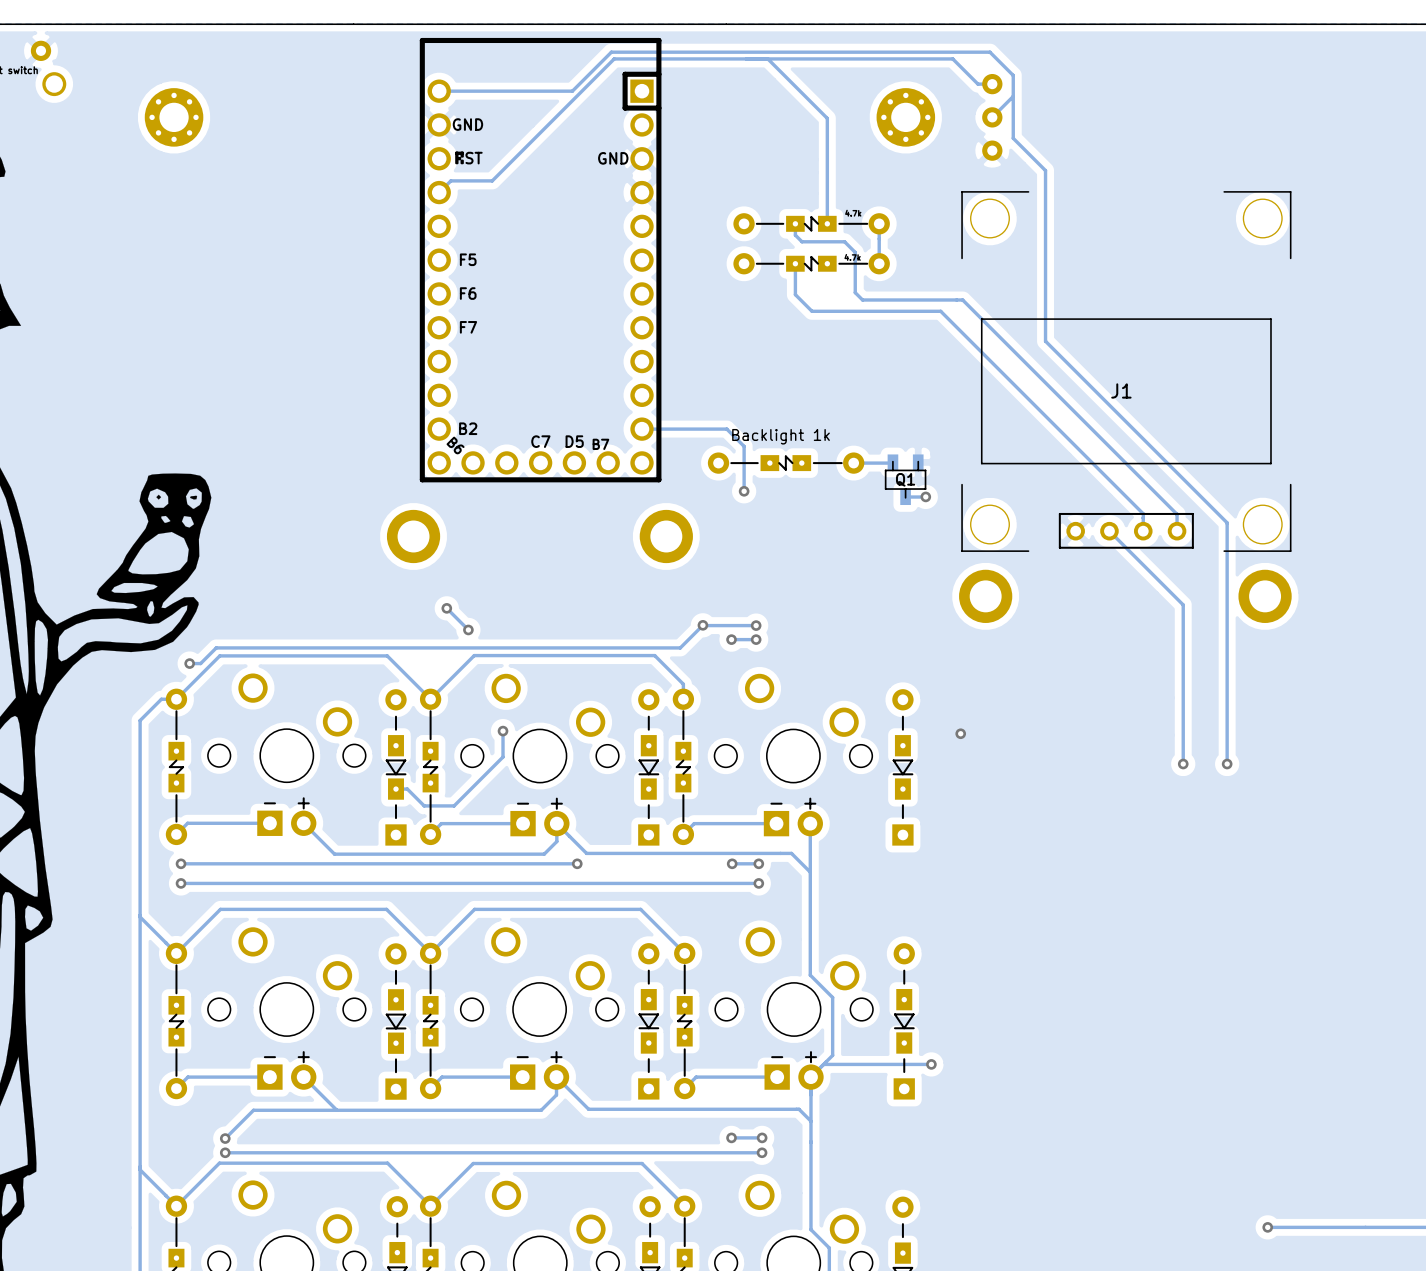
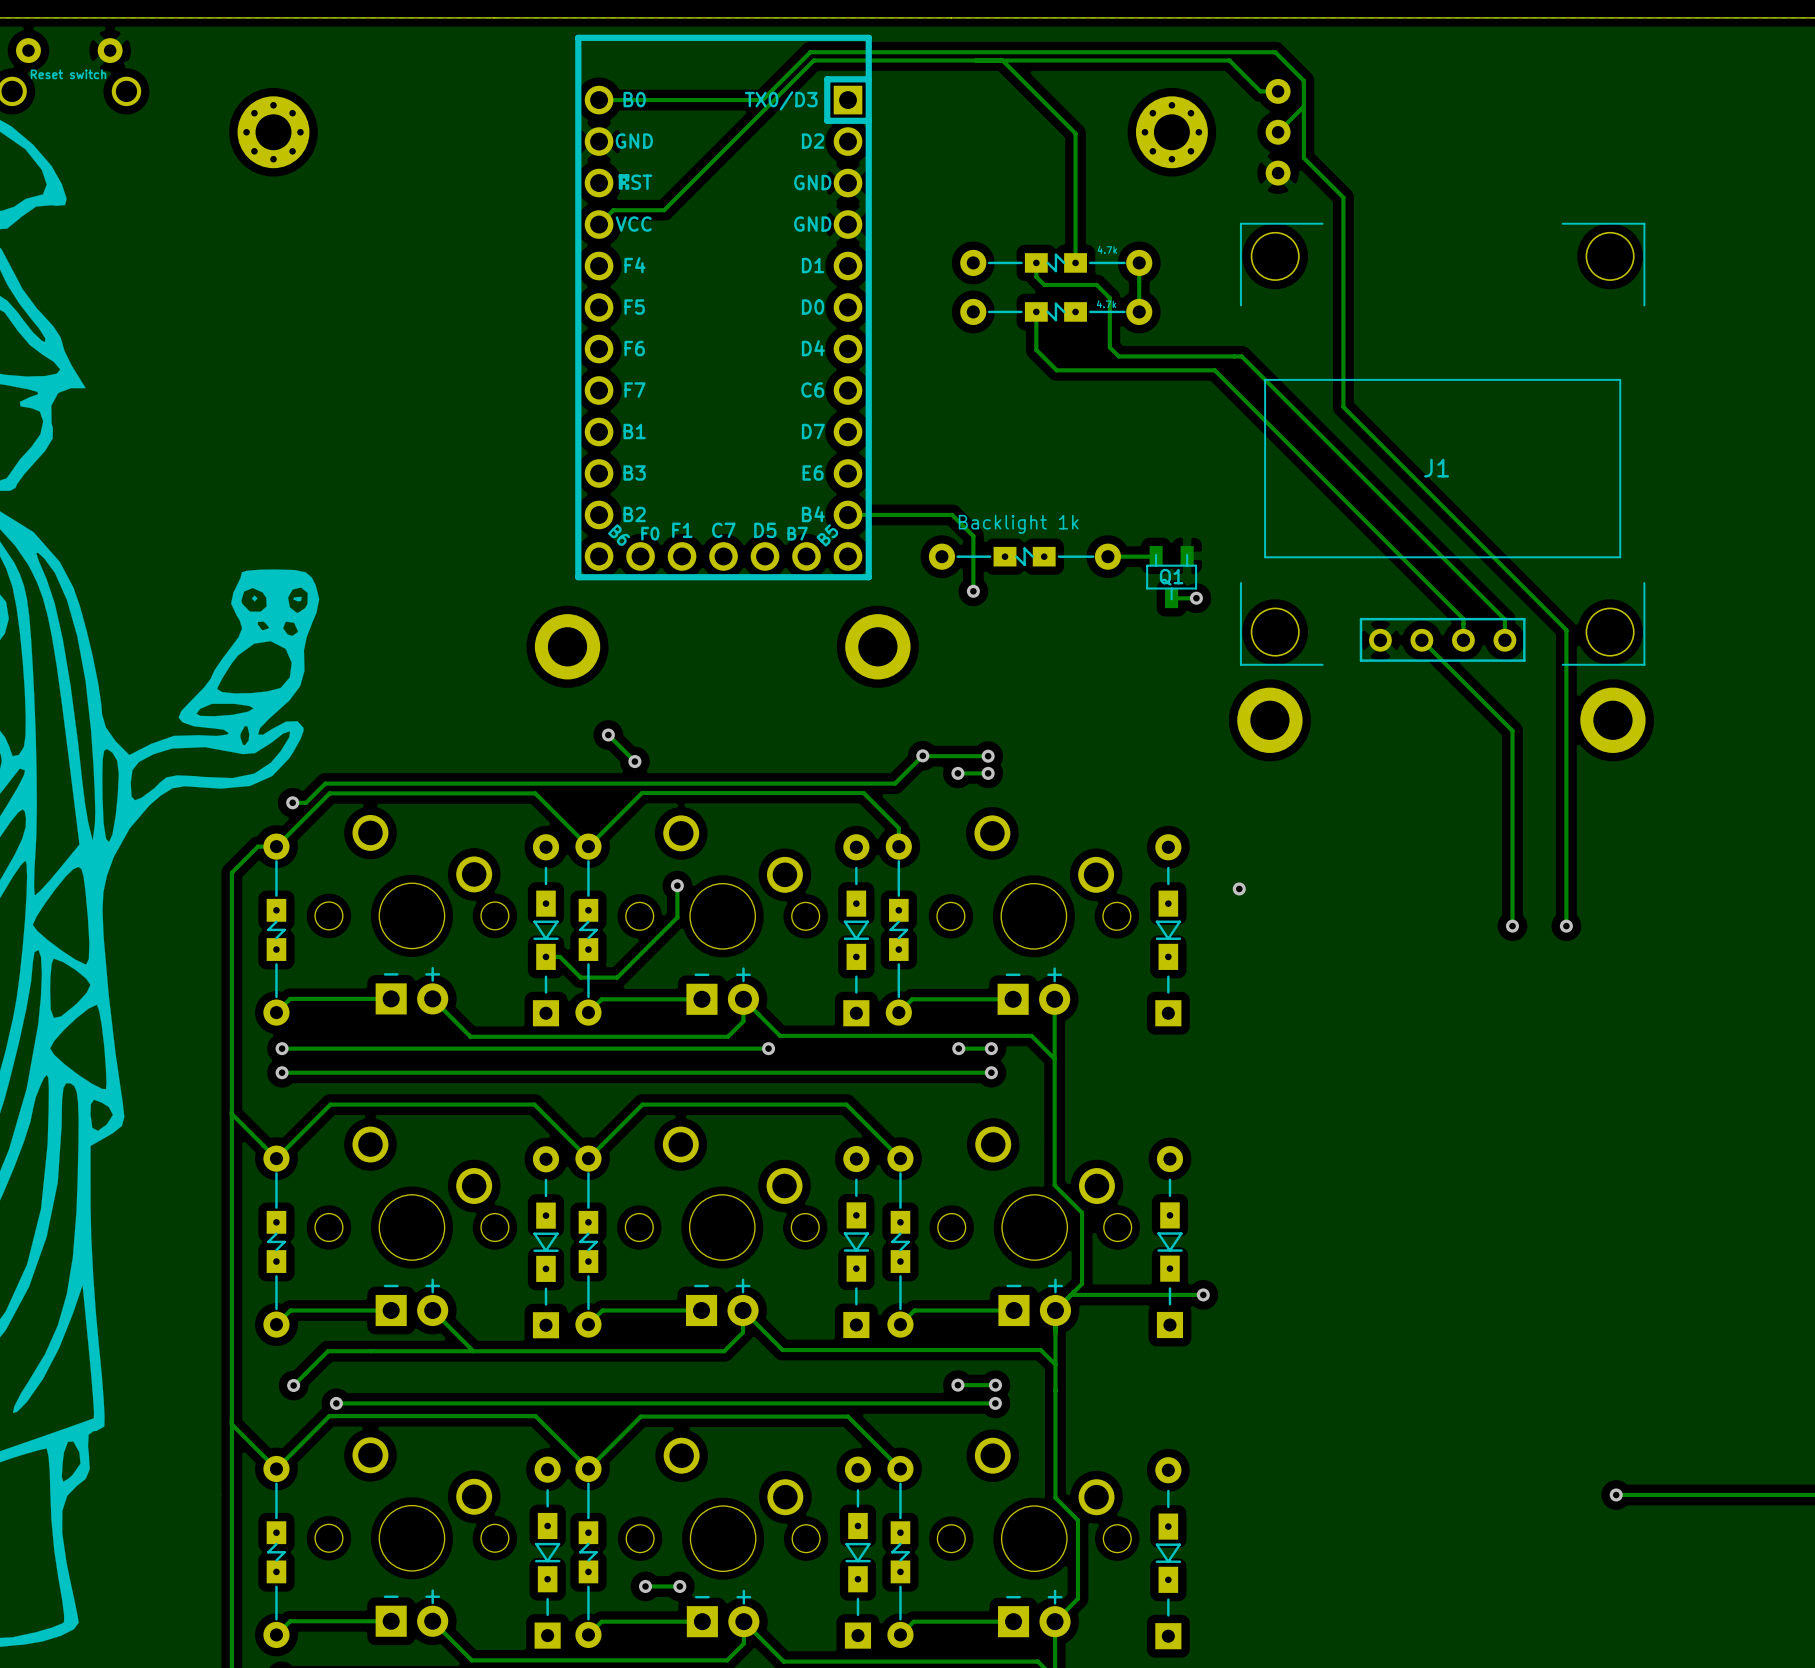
part footprint: [419, 37, 662, 483] -> [575, 34, 872, 581]
track: (253, 1110) (225, 1138) -> (371, 1351) (327, 1351) (293, 1385)
via position: (225, 1138) -> (293, 1385)

